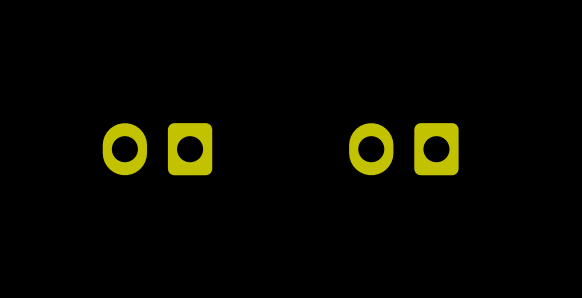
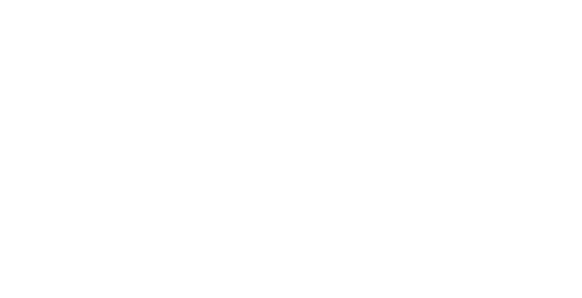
part: (157, 149) -> none
part: (403, 149) -> none

